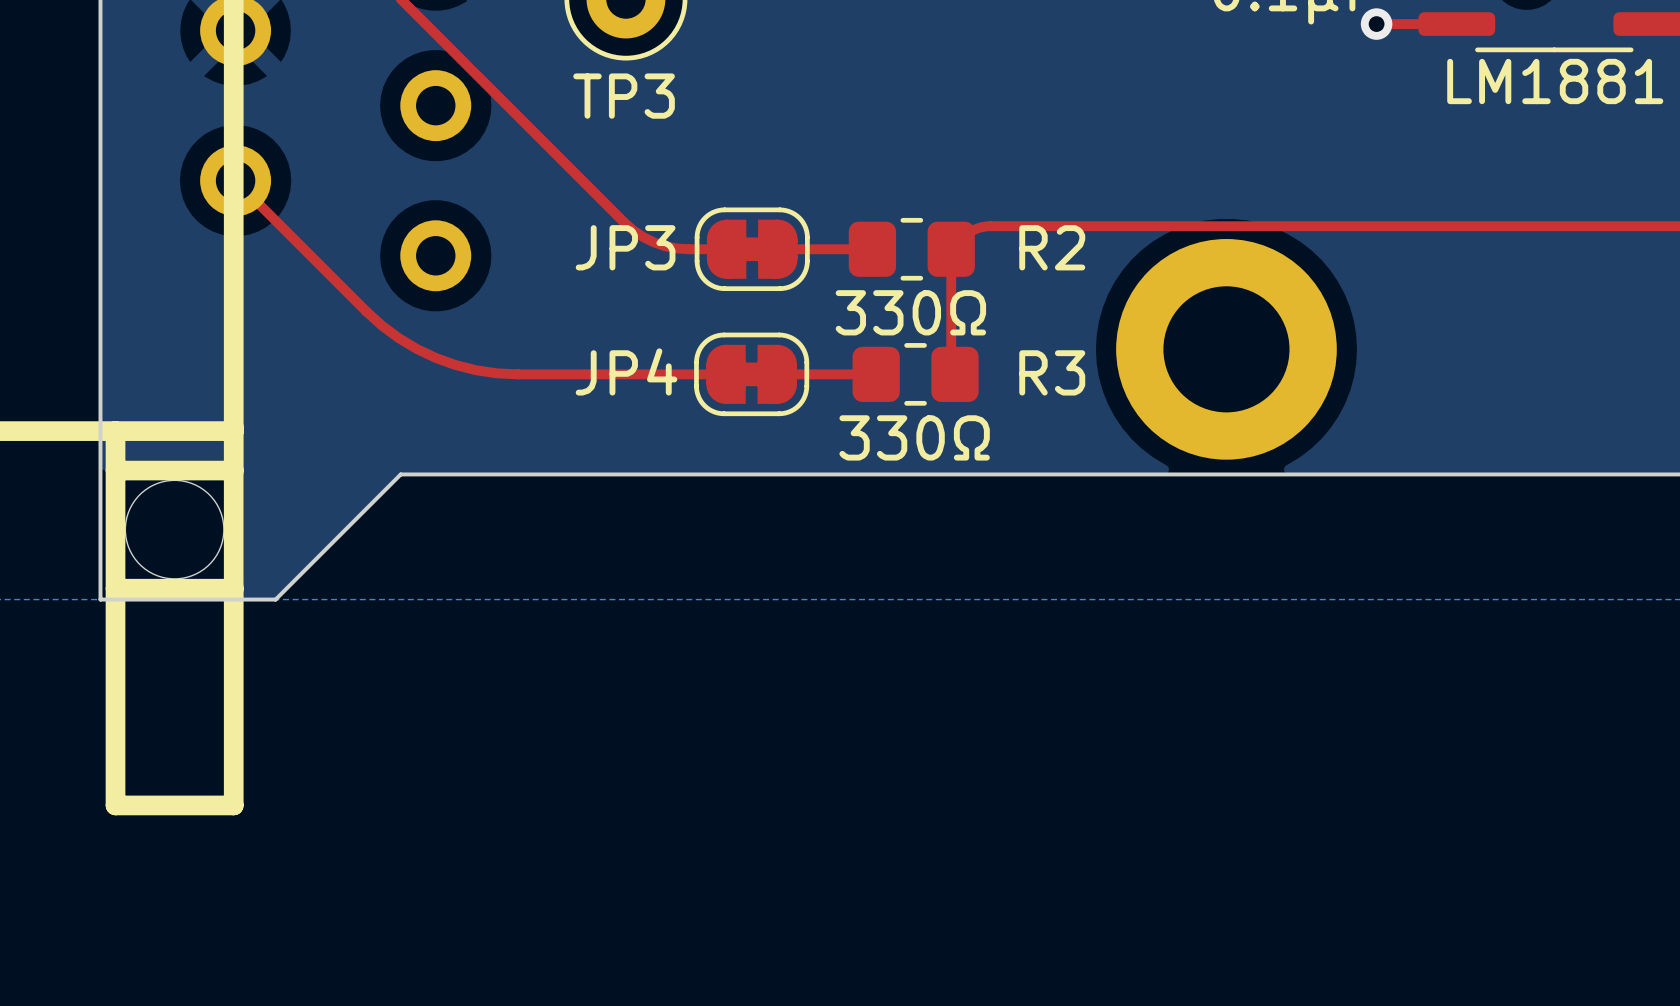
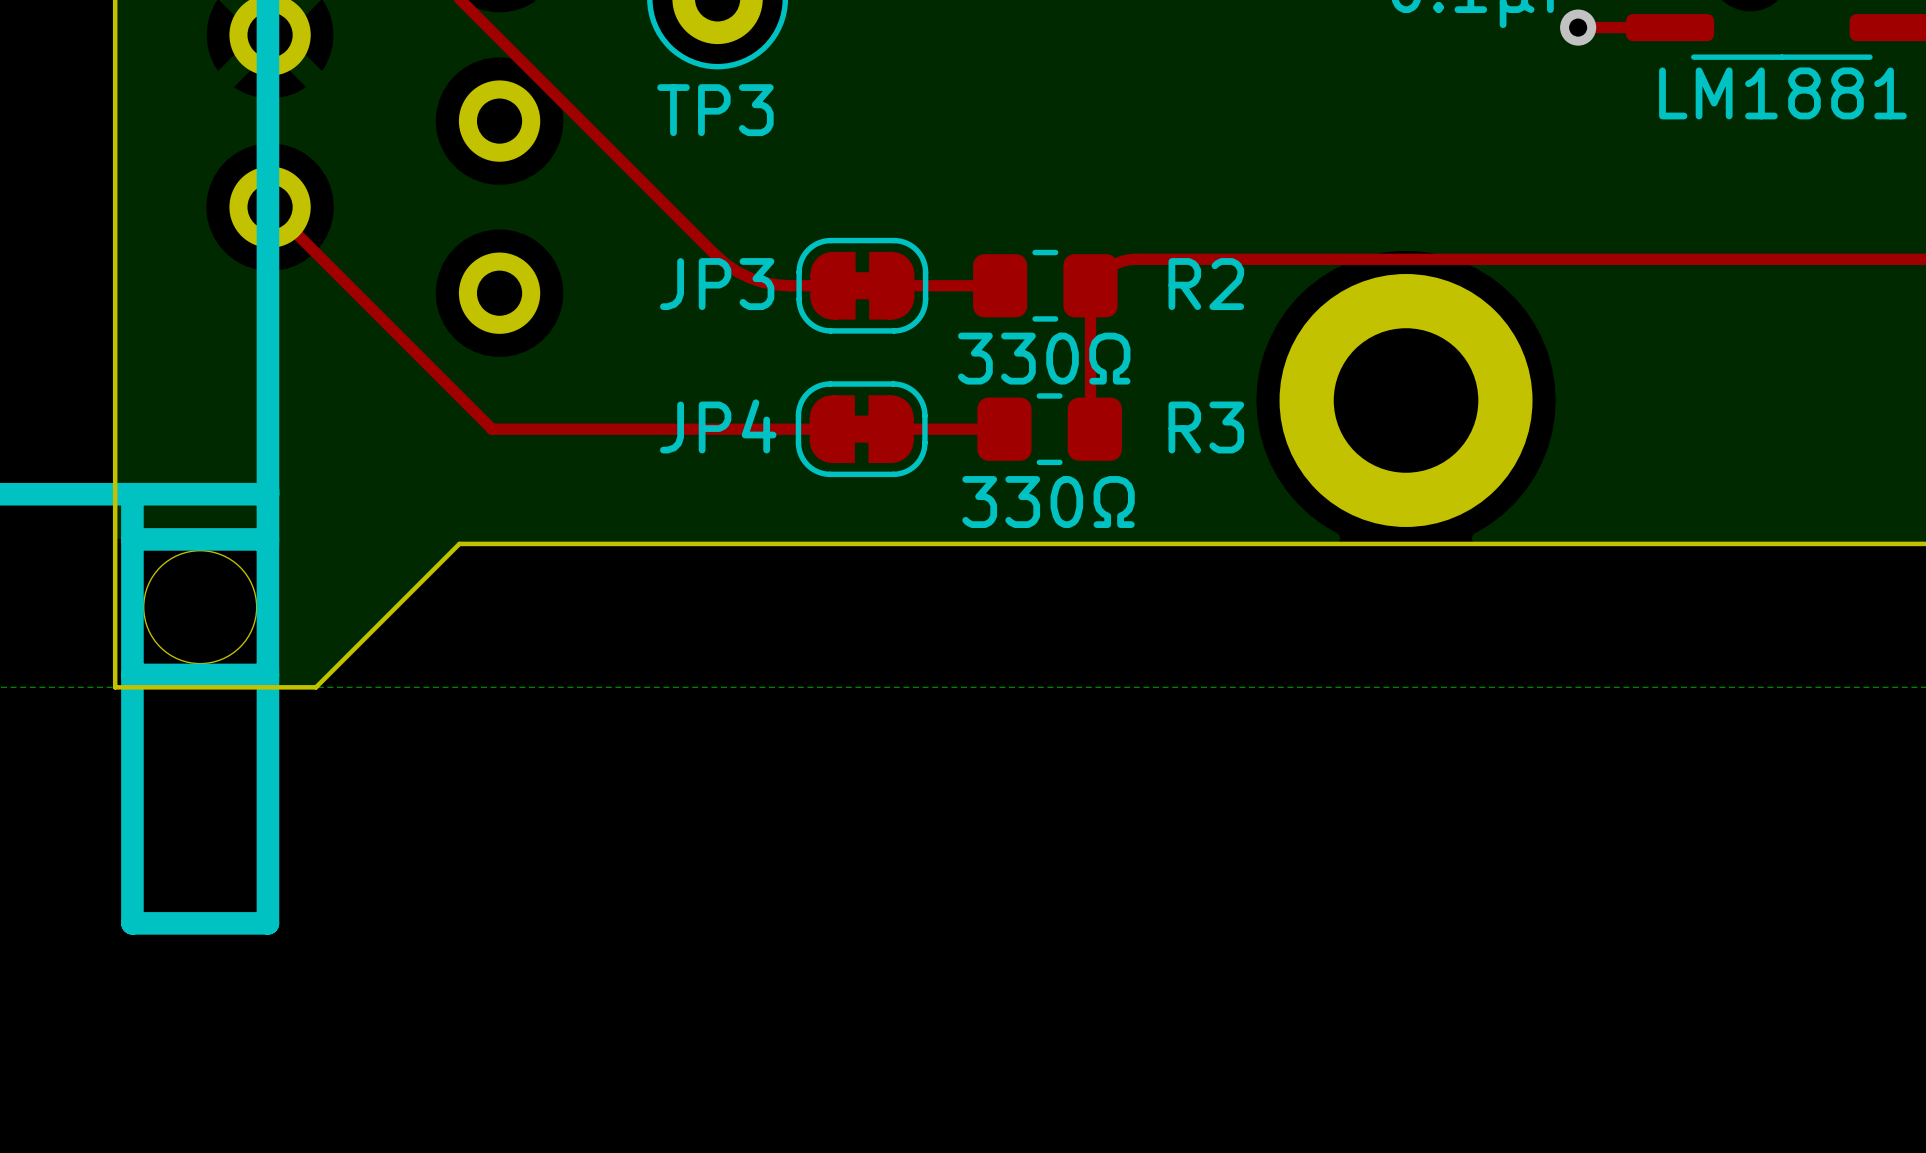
top track: (366, 311) (398, 338) (436, 358) (476, 370) (518, 374) -> (420, 357) (492, 429) (593, 429)

